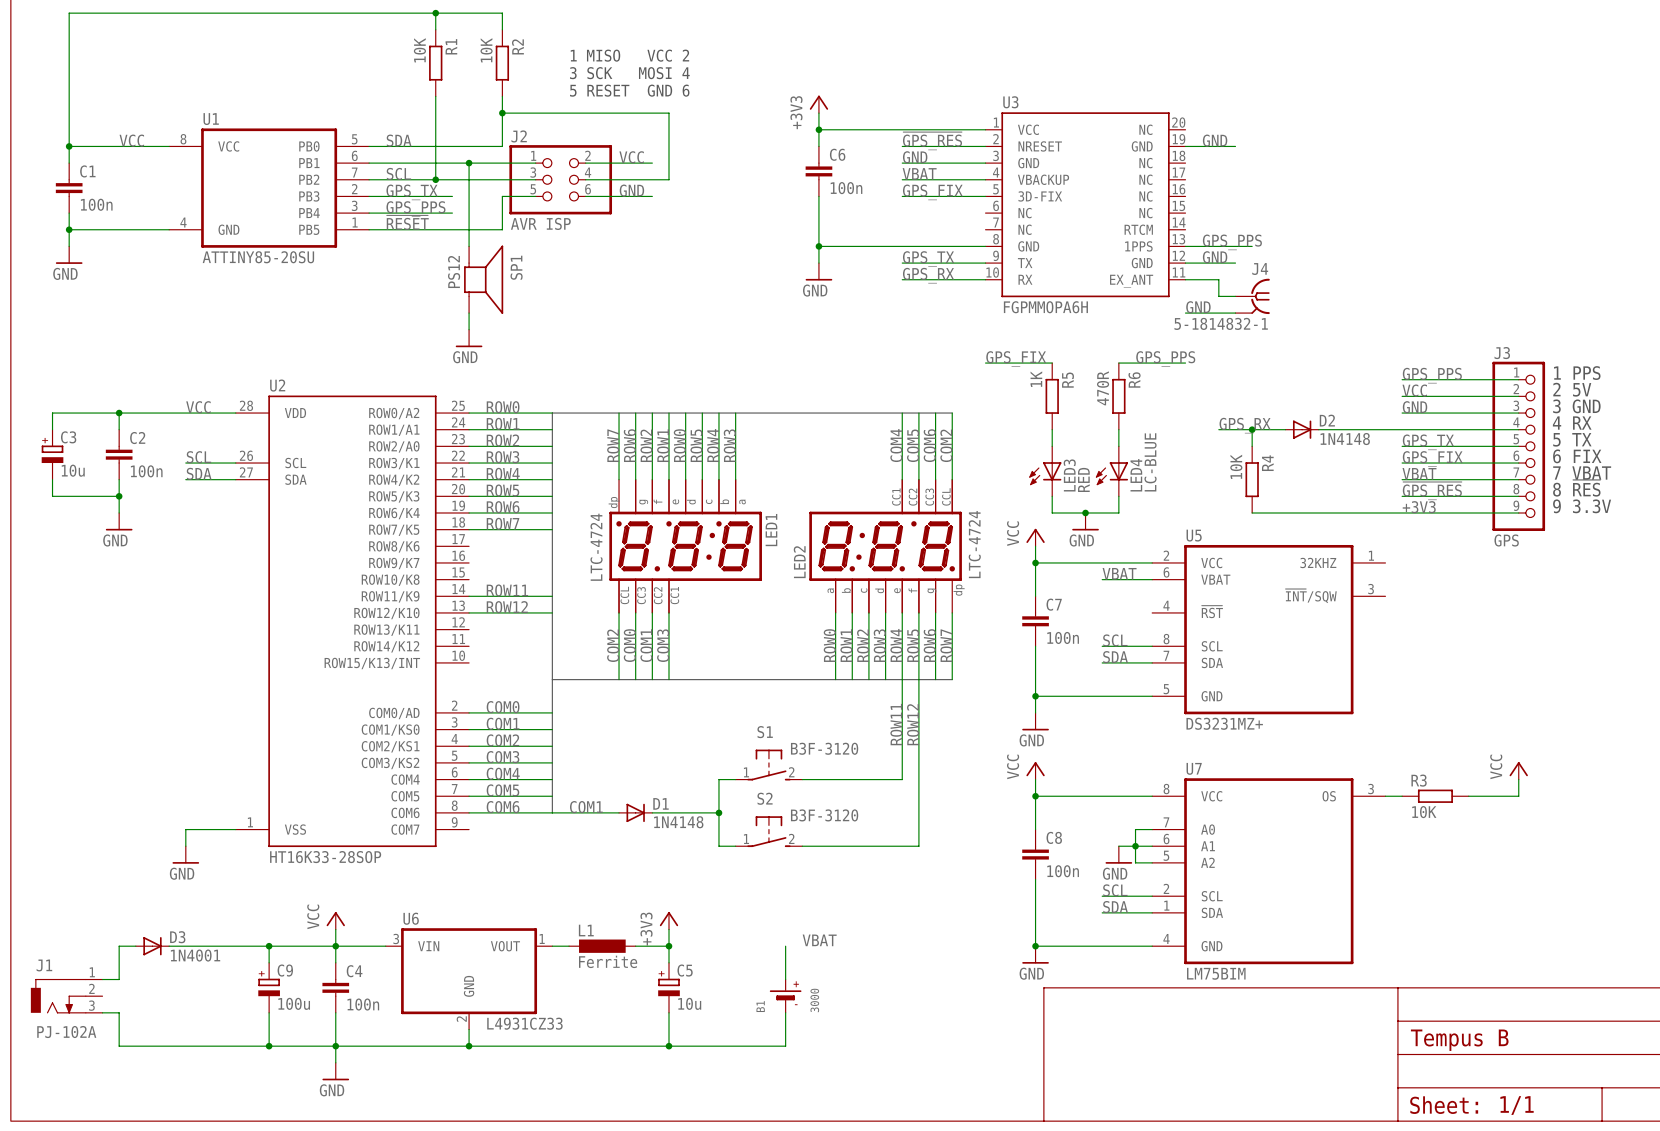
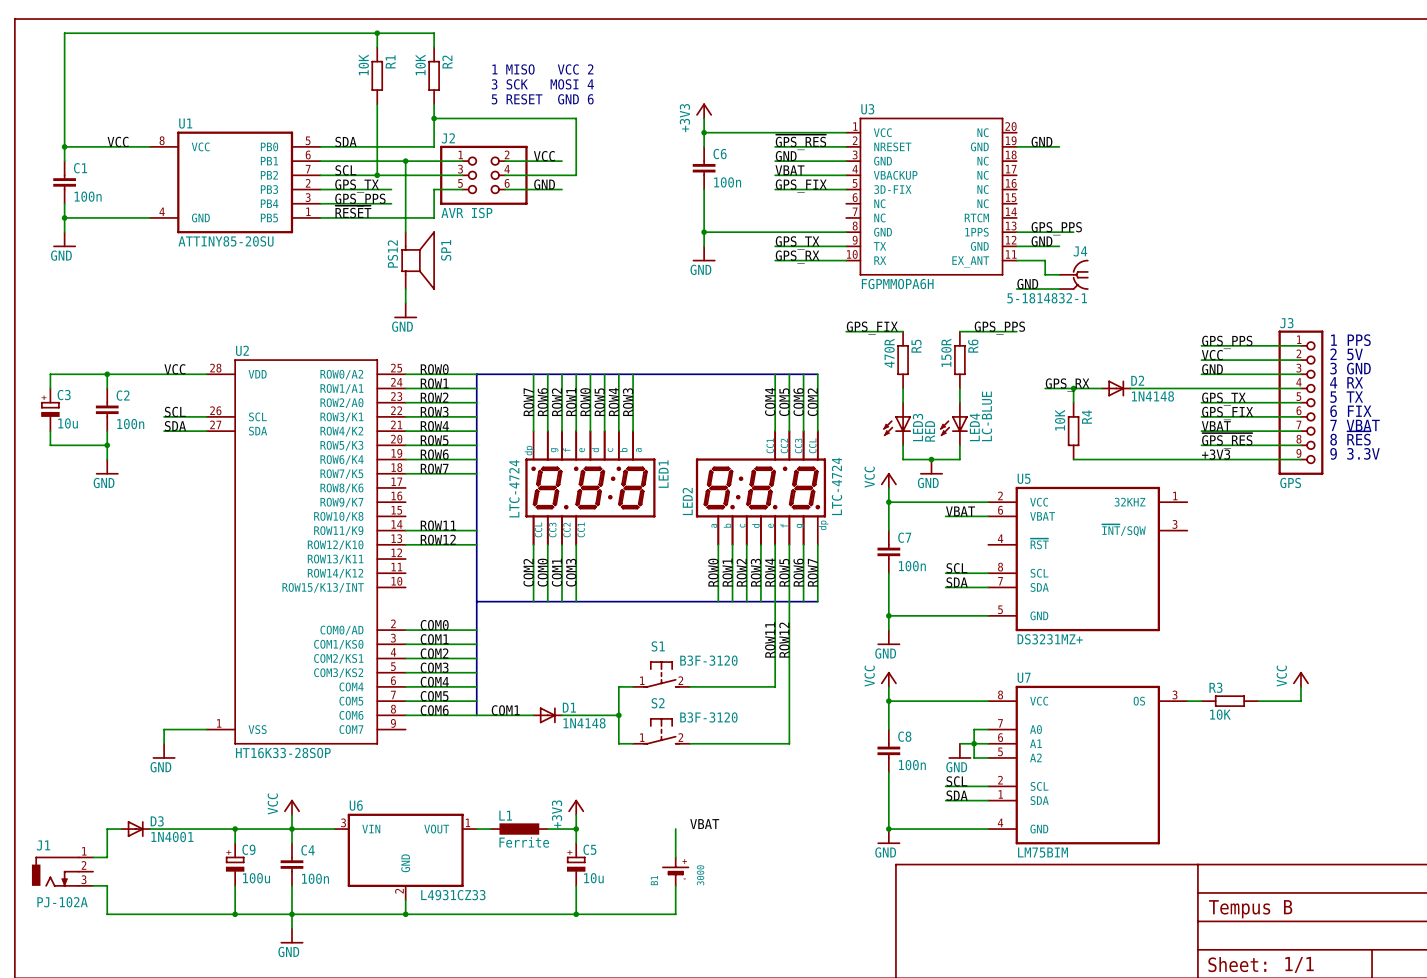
R5 value: 1K (1036, 379) -> 470R (889, 353)
R6 value: 470R (1103, 388) -> 150R (946, 352)

